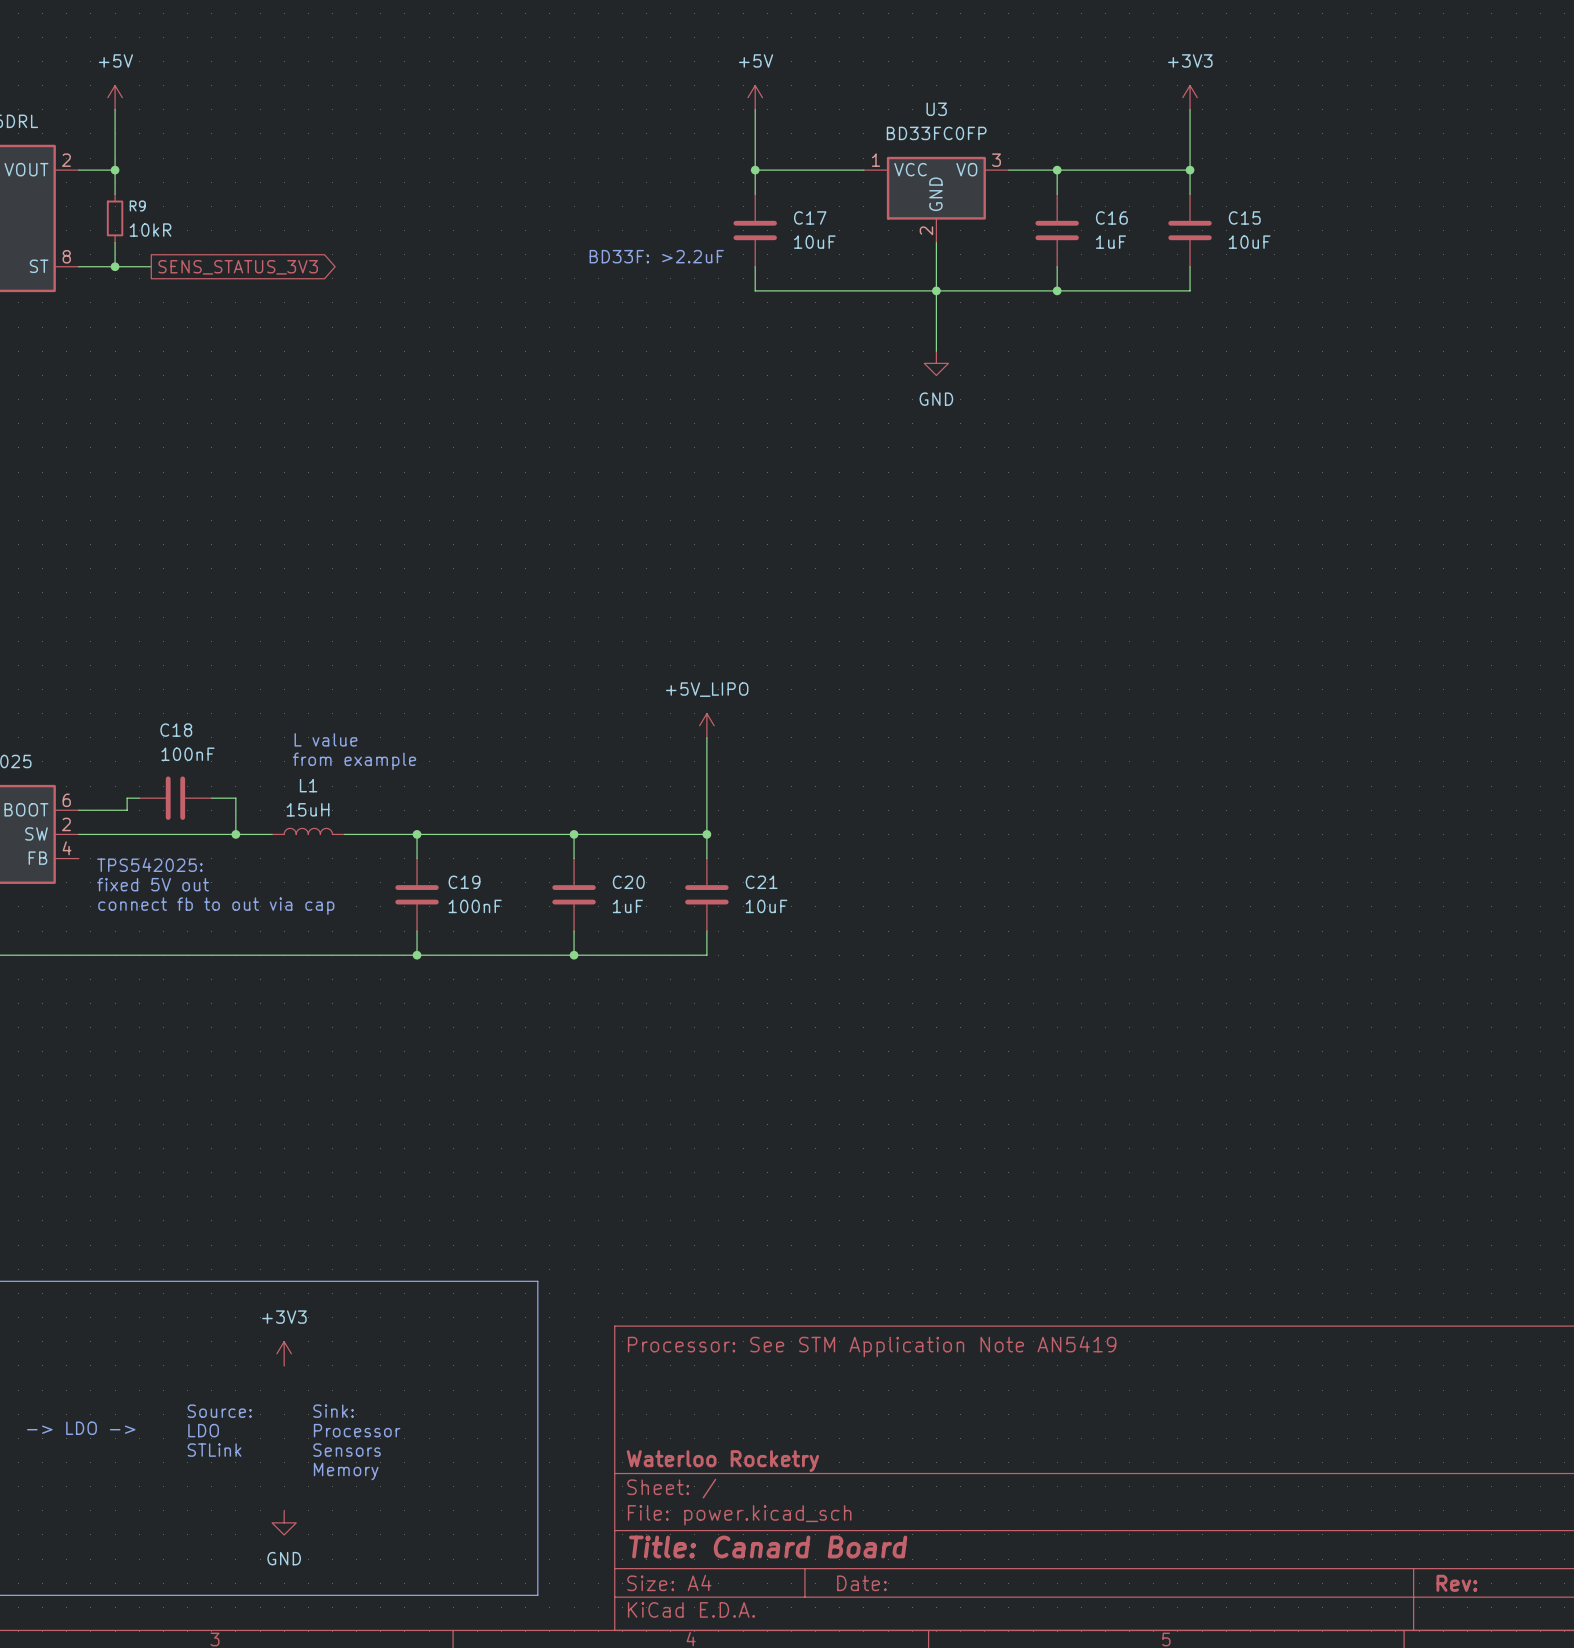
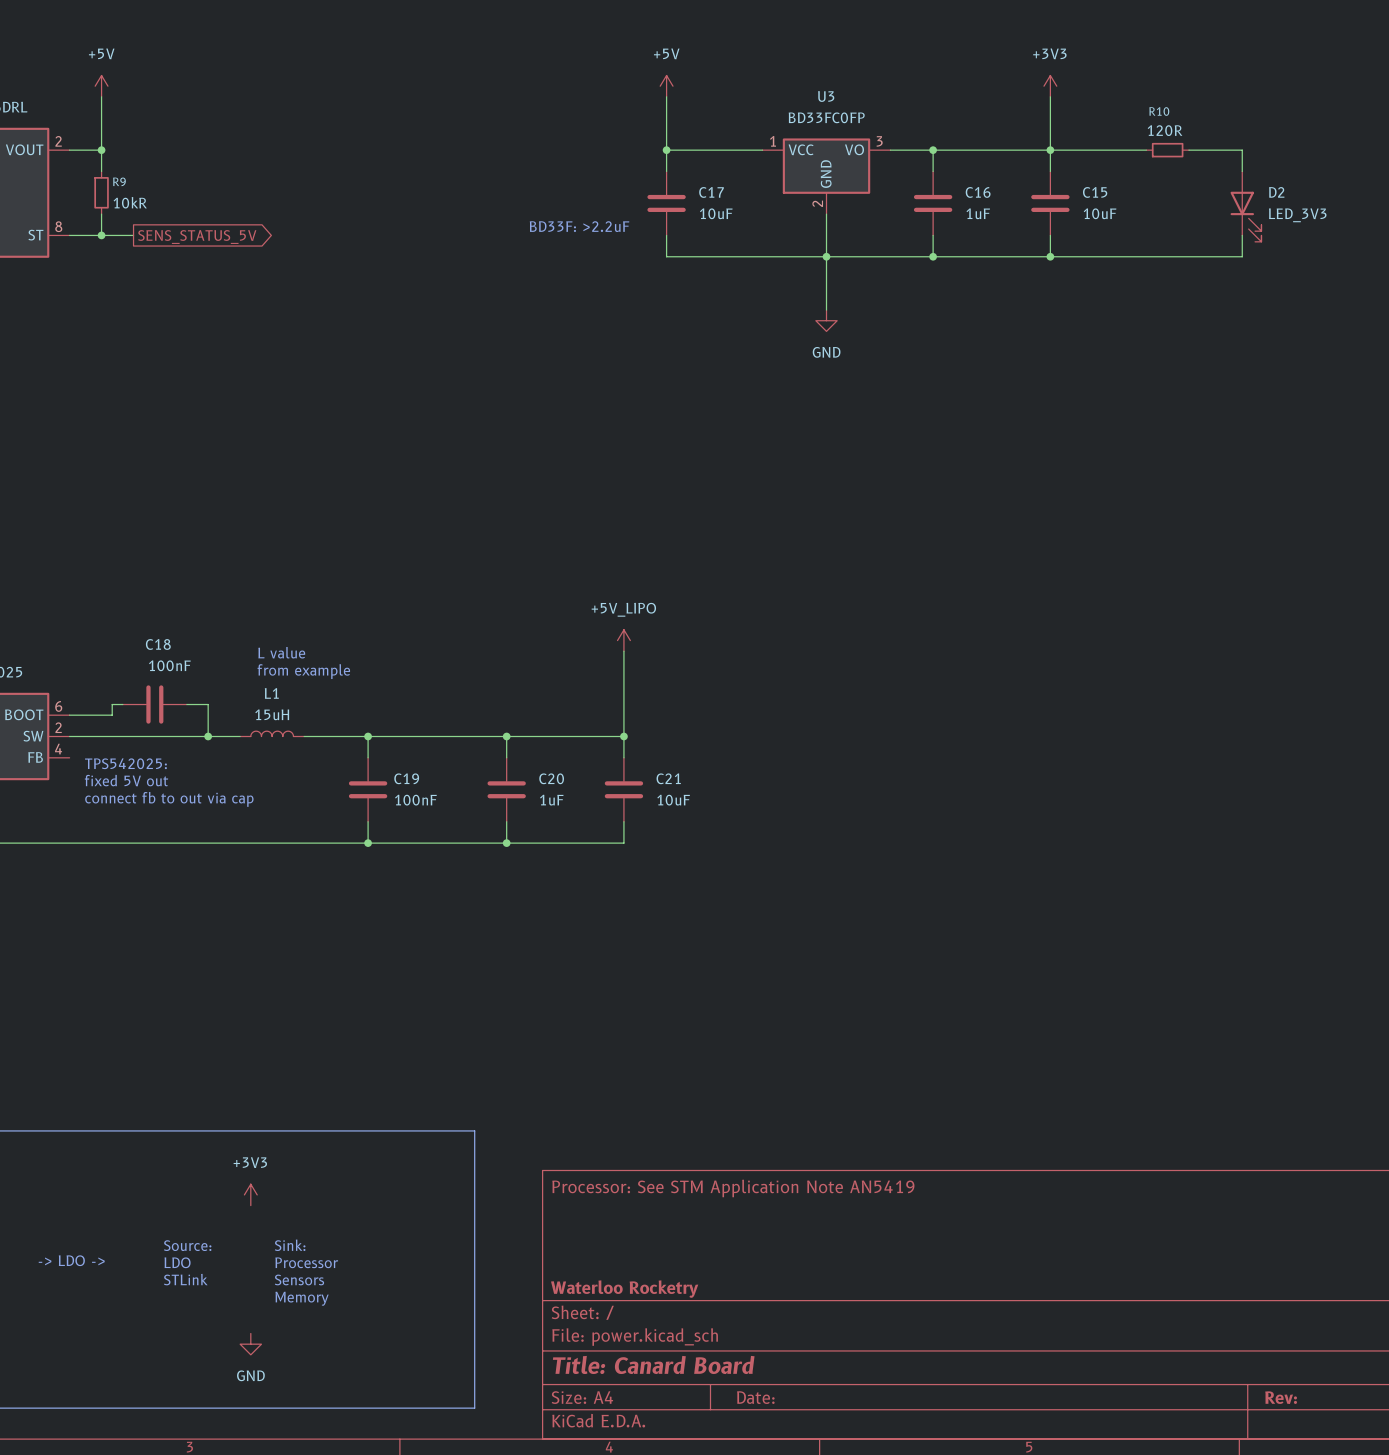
wire: none -> (1050, 150) (1146, 150)
R10: none -> 120R (1167, 150)
wire: none -> (1188, 150) (1242, 150) (1242, 171)
D2: none -> LED_3V3 (1246, 206)
wire: none -> (1242, 235) (1242, 256) (1050, 256)
global label: SENS_STATUS_3V3 (238, 267) -> SENS_STATUS_5V (197, 237)
junction: none -> (1050, 256)

